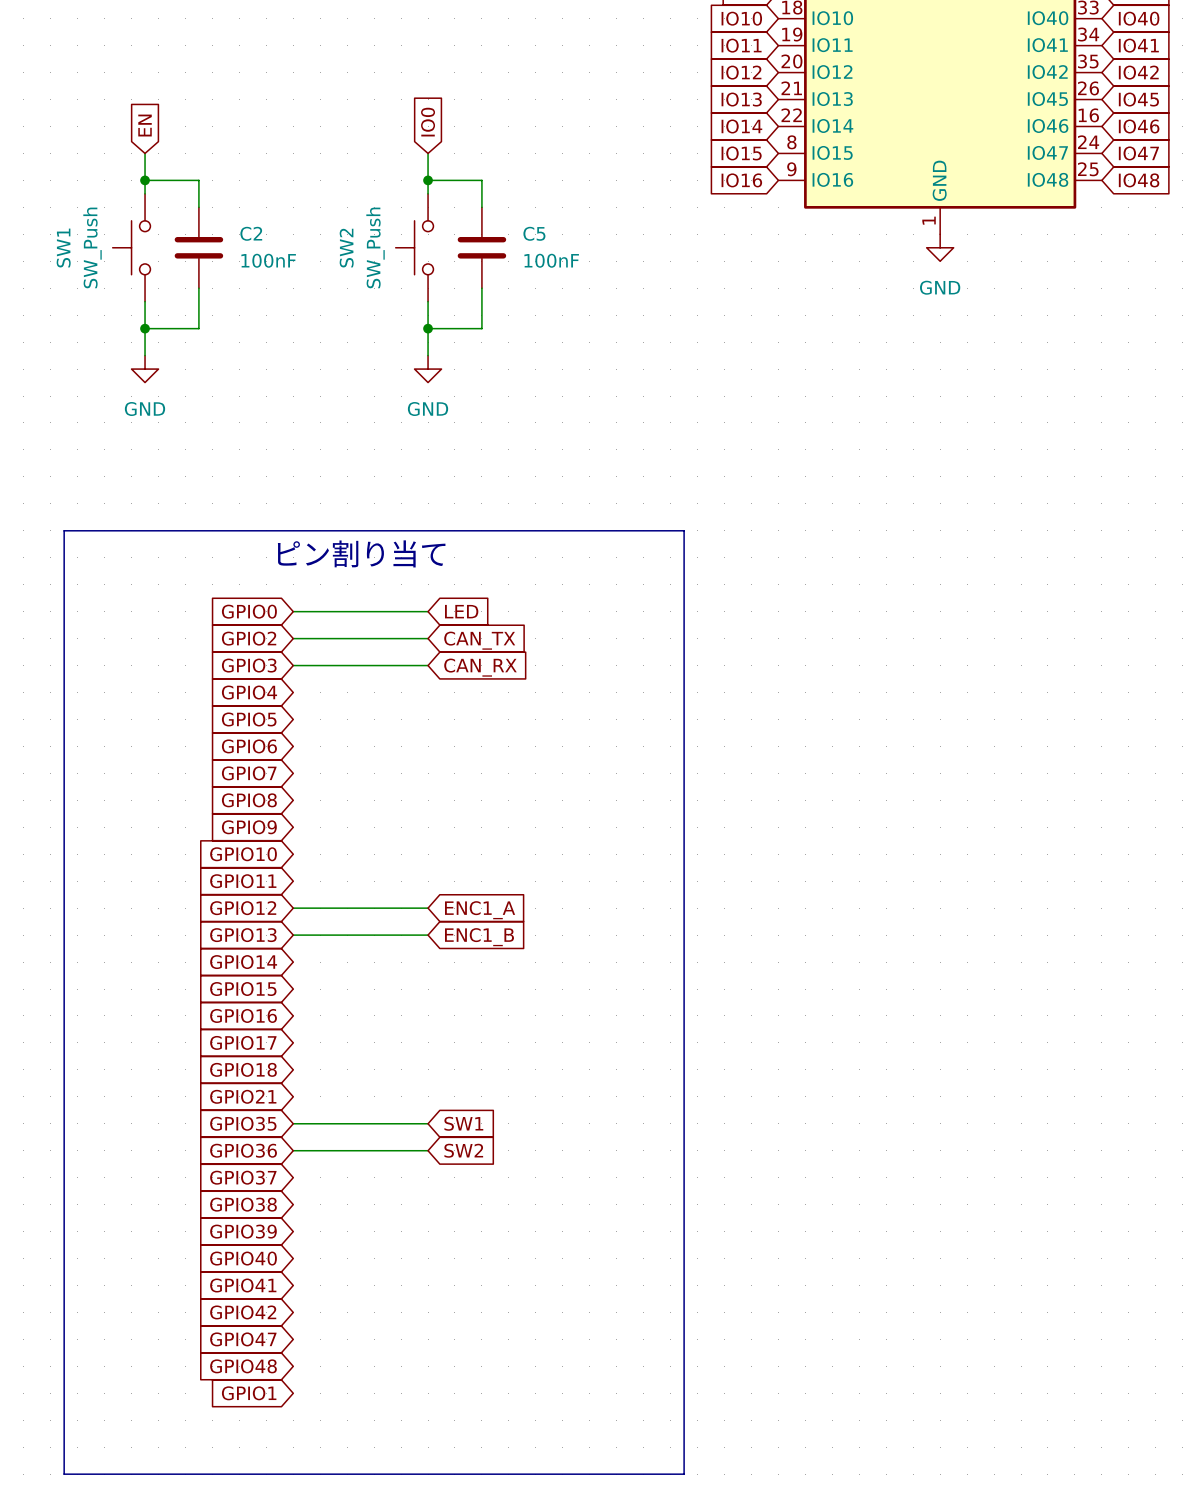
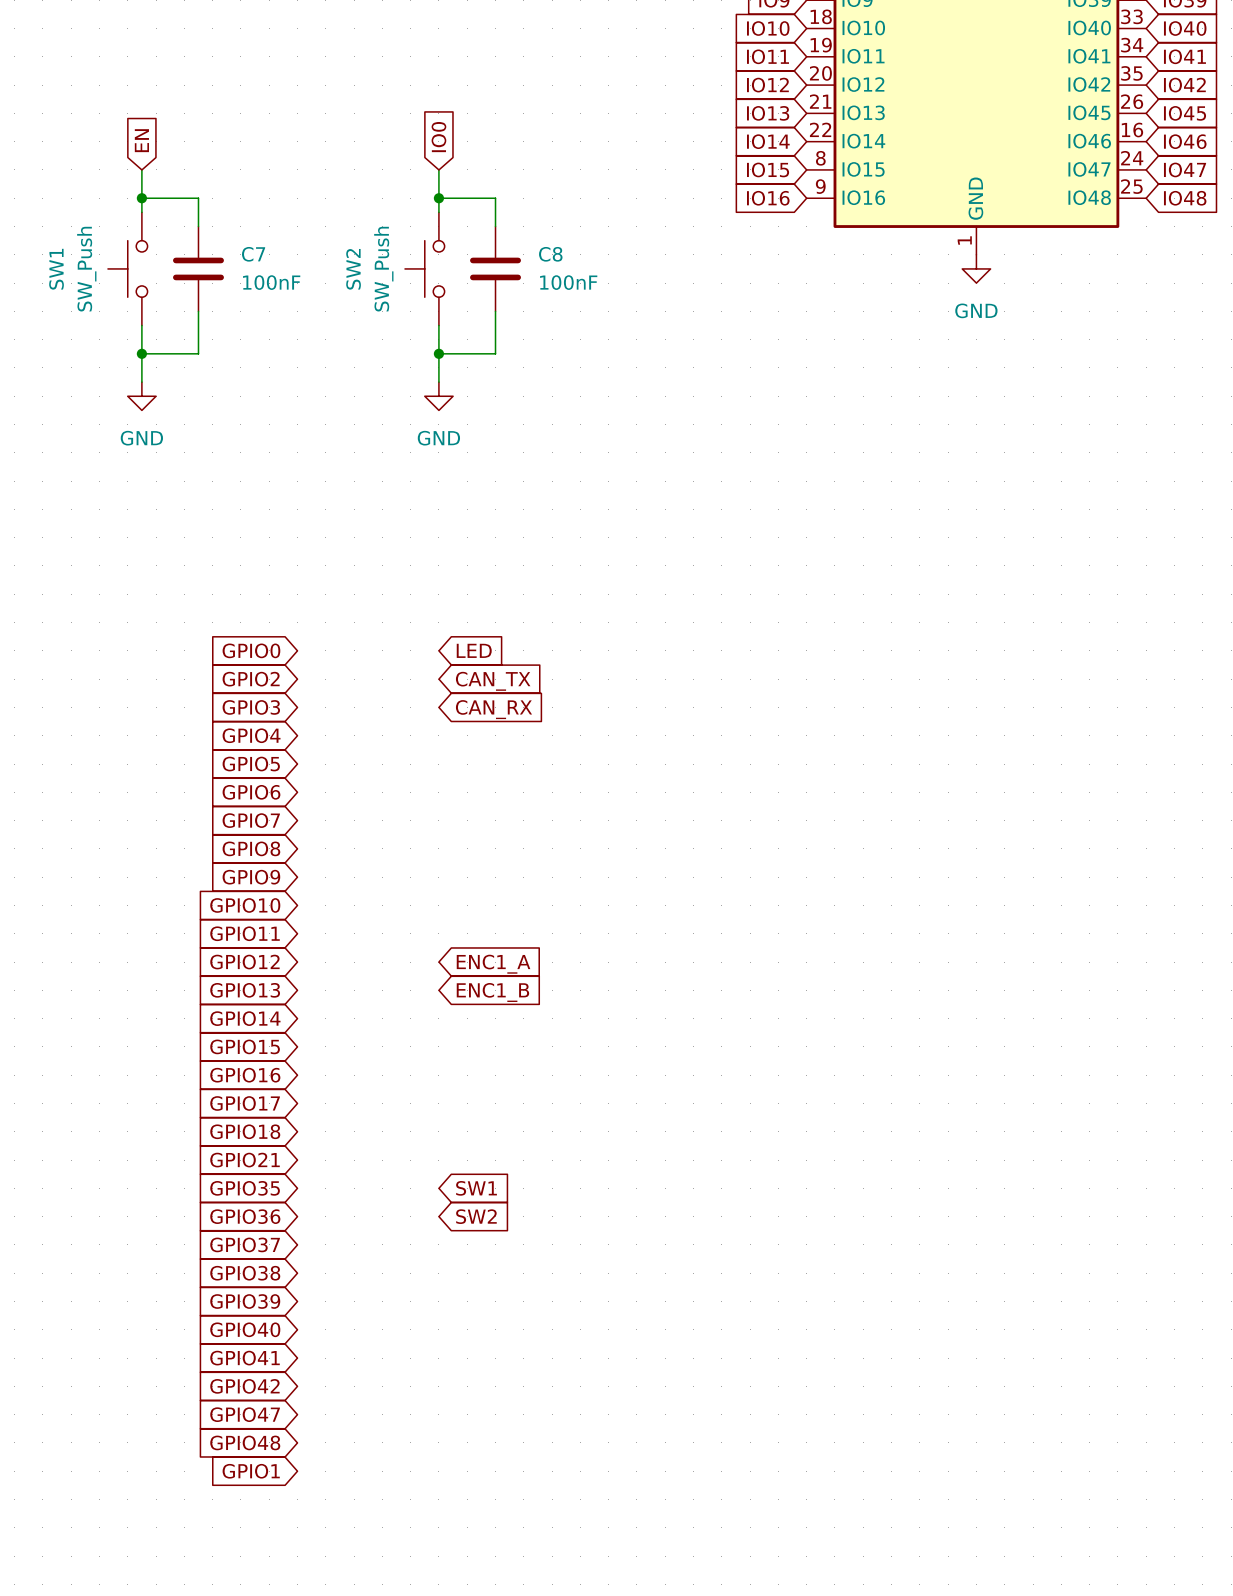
C2 name: C2 (251, 233) -> C7 (253, 254)
C5 name: C5 (534, 233) -> C8 (550, 254)
line: (64, 530) (684, 530) (684, 1474) (64, 1474) (64, 530) -> none
text: ピン割り当て (361, 553) -> none
wire: (293, 611) (428, 611) -> none
wire: (293, 638) (428, 638) -> none
wire: (293, 665) (428, 665) -> none
wire: (293, 908) (428, 908) -> none
wire: (293, 935) (428, 935) -> none
wire: (293, 1123) (428, 1123) -> none
wire: (293, 1150) (428, 1150) -> none

